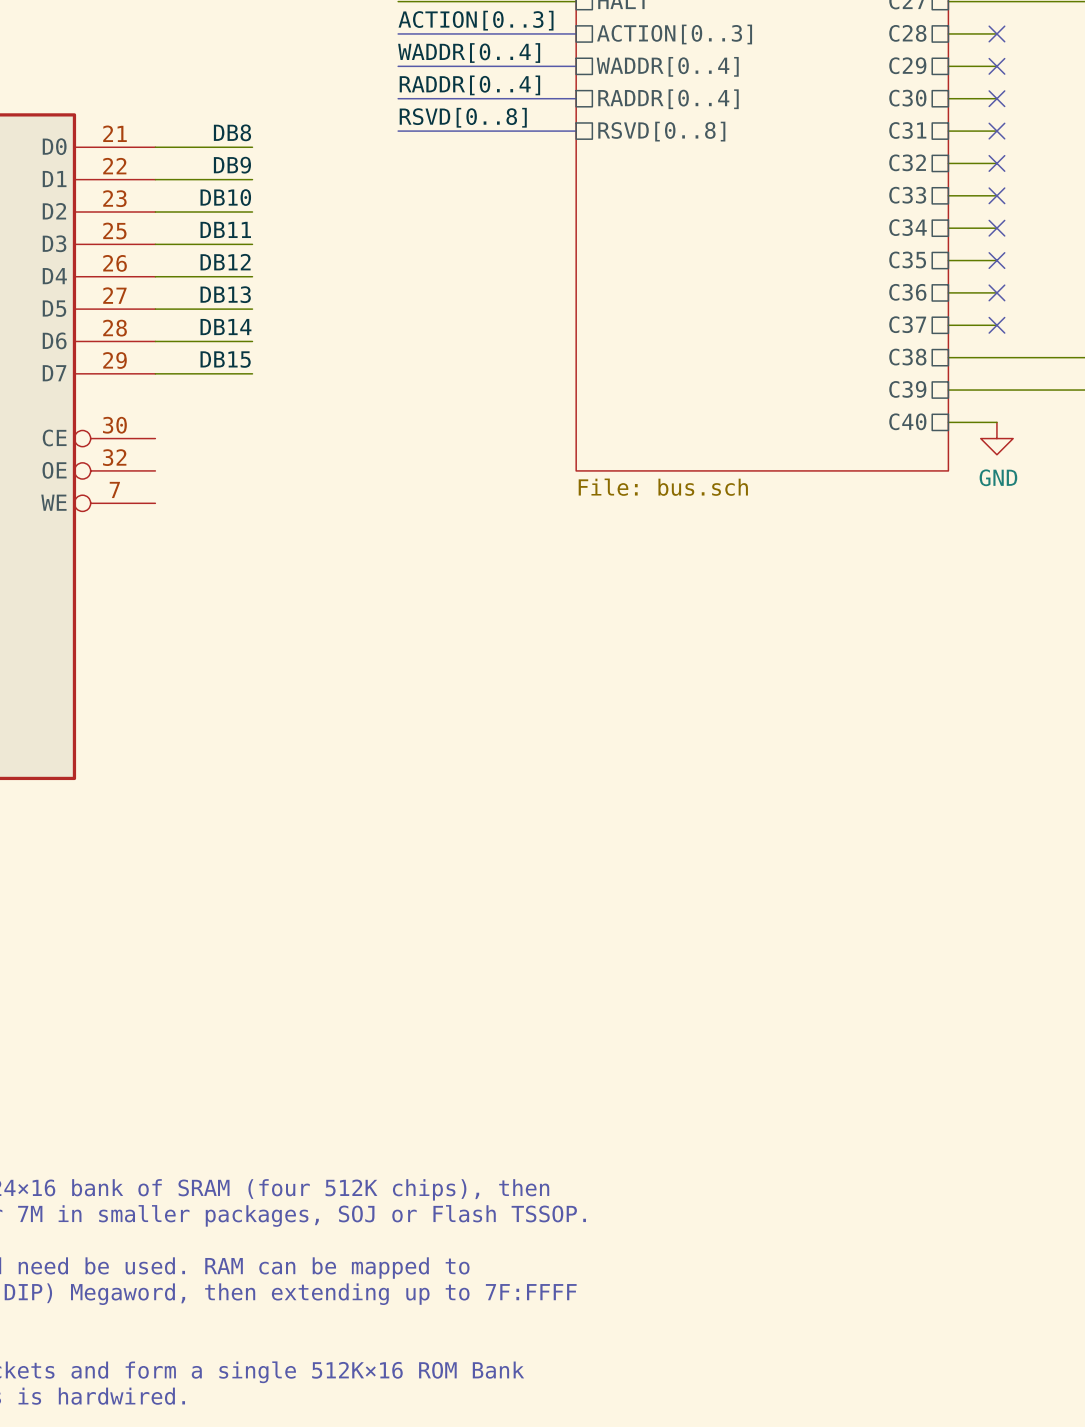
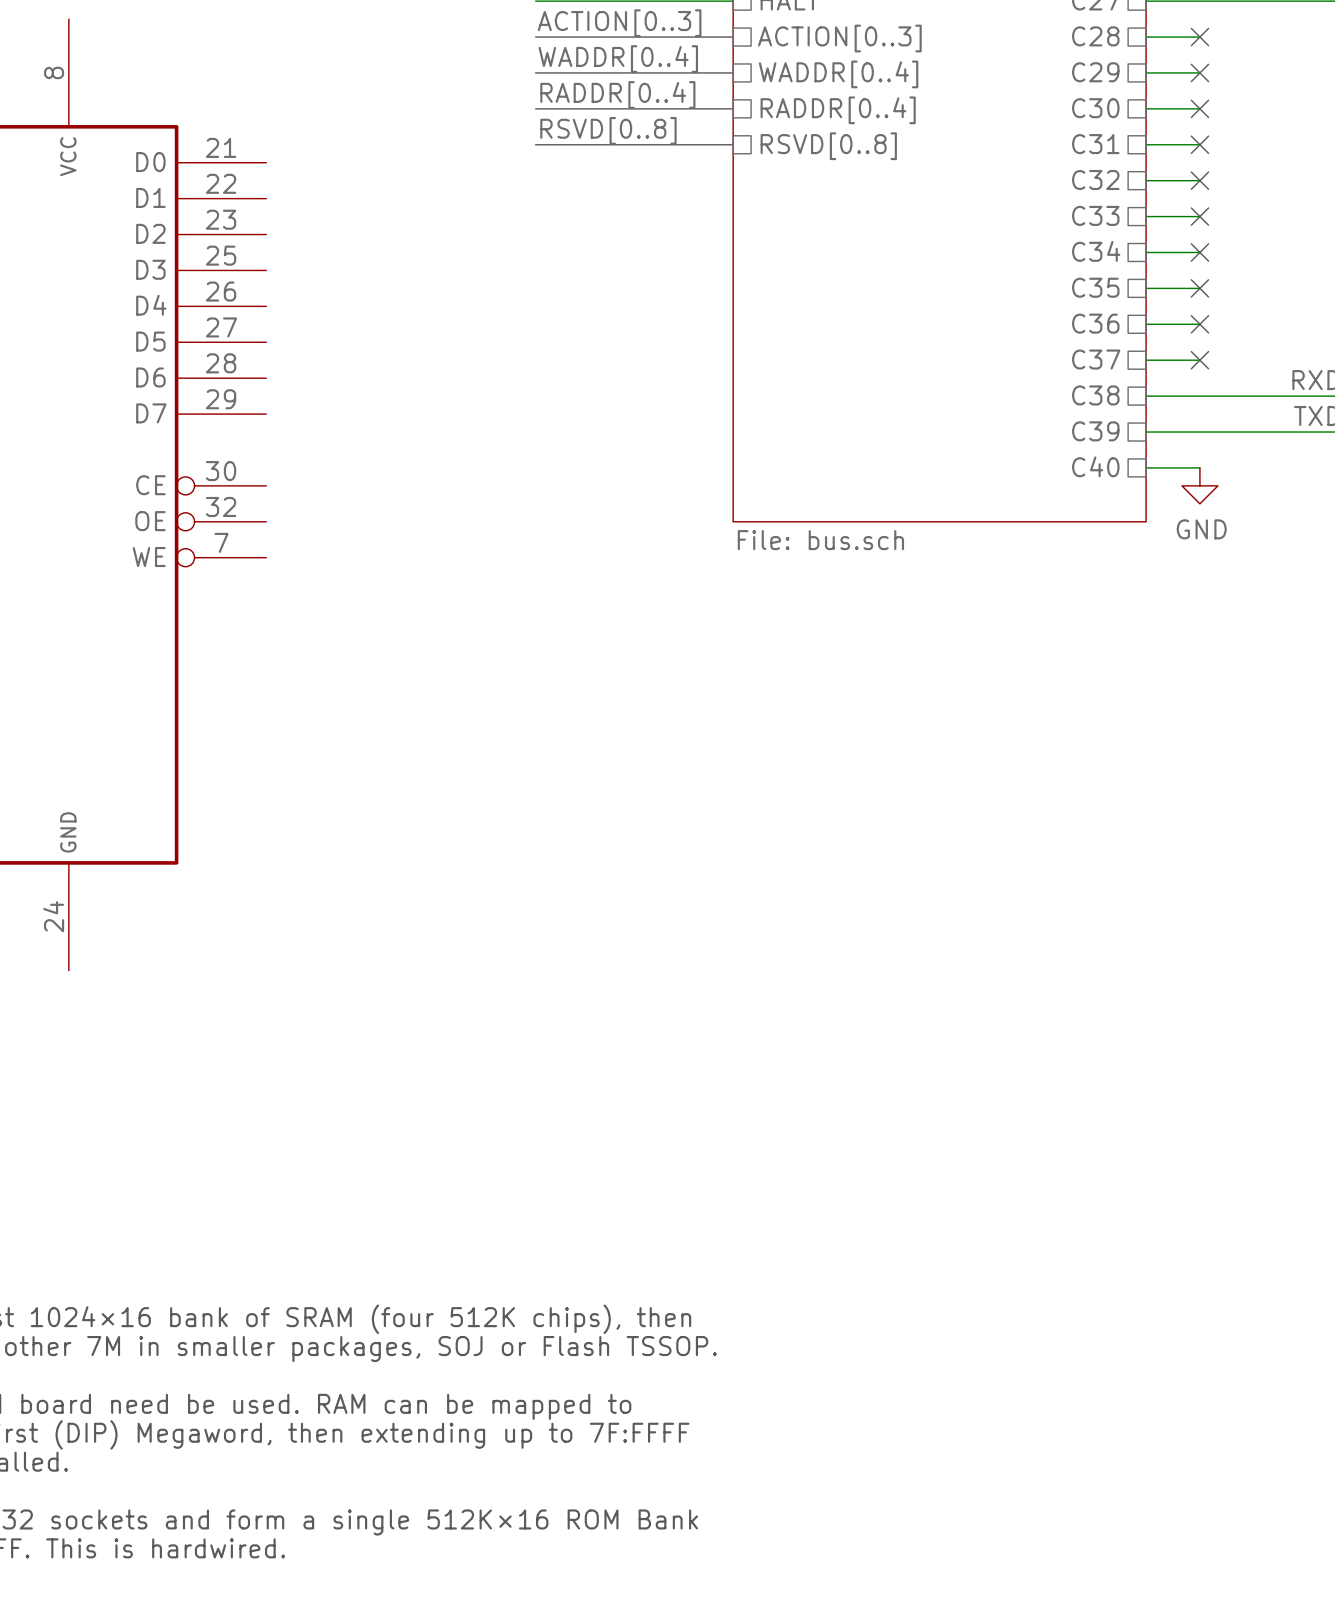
label: DB8 (232, 132) -> none
wire: (155, 147) (252, 147) -> none
label: DB9 (232, 165) -> none
wire: (155, 179) (252, 179) -> none
label: DB10 (225, 197) -> none
wire: (155, 212) (252, 212) -> none
label: DB11 (225, 229) -> none
wire: (155, 244) (252, 244) -> none
label: DB12 (225, 262) -> none
wire: (155, 276) (252, 276) -> none
label: DB13 (225, 294) -> none
wire: (155, 309) (252, 309) -> none
label: DB14 (225, 327) -> none
wire: (155, 341) (252, 341) -> none
label: DB15 (225, 359) -> none
wire: (155, 373) (252, 373) -> none

